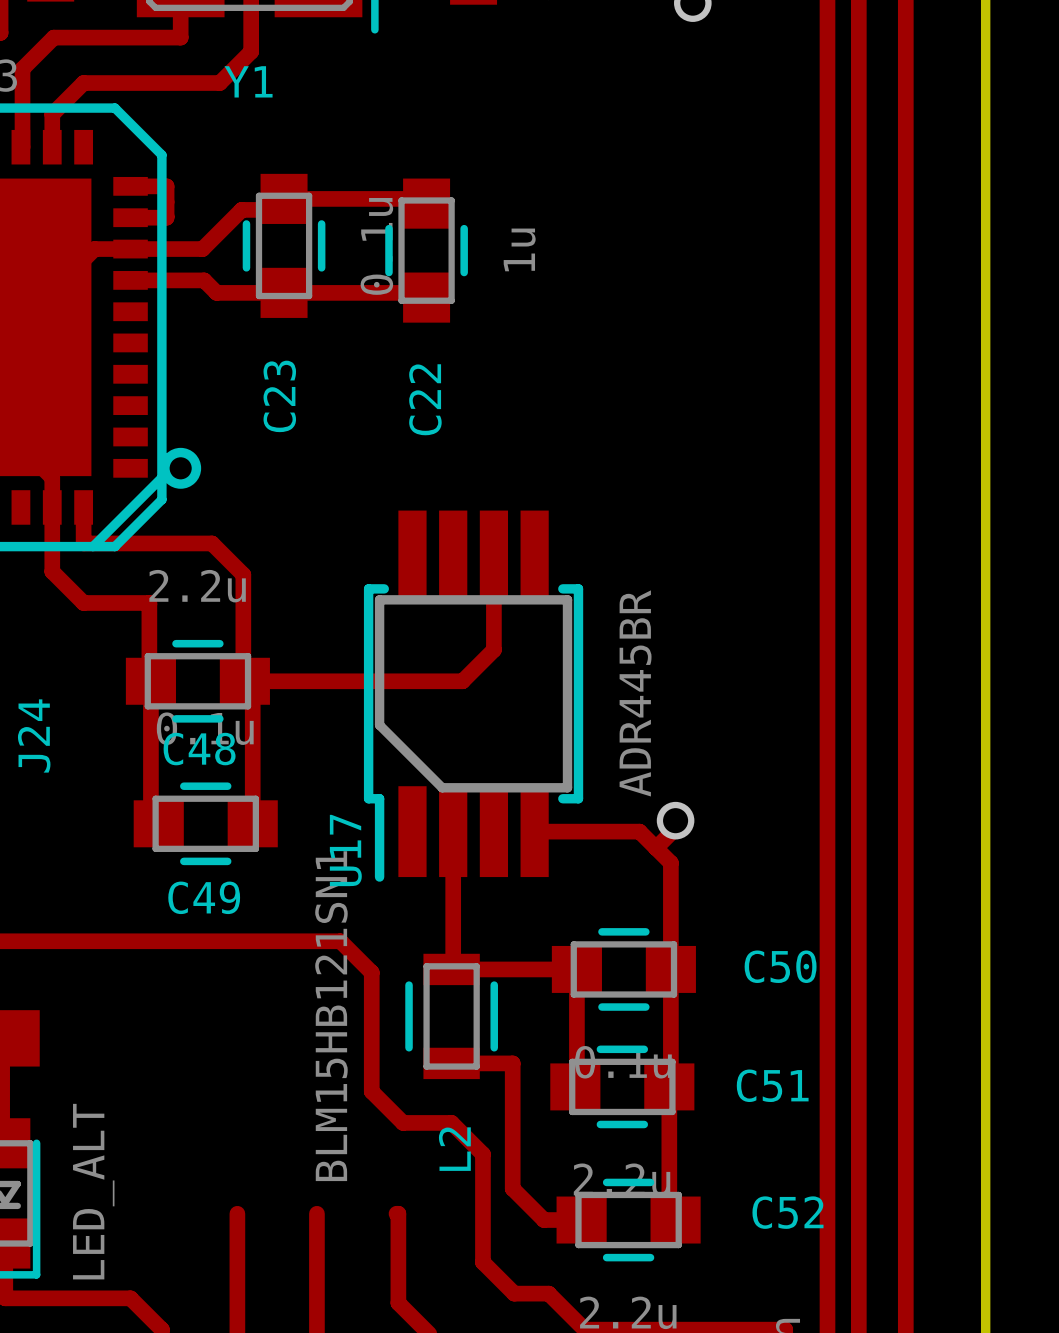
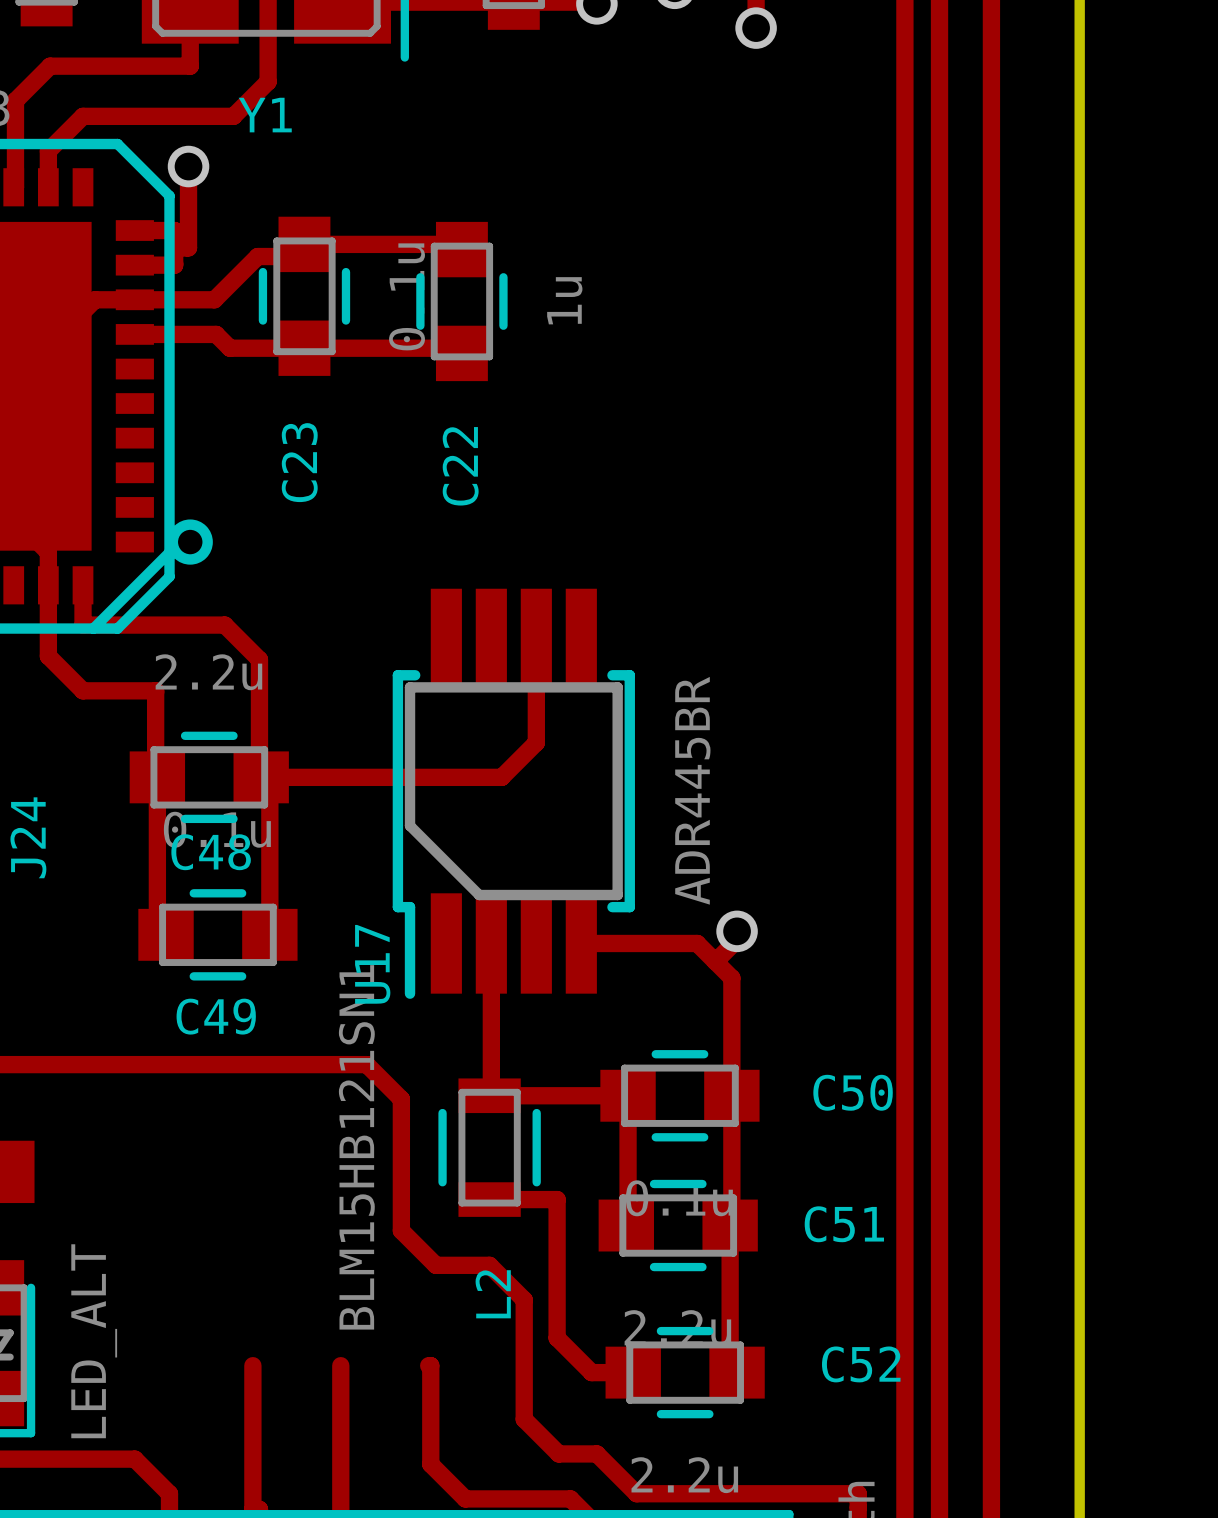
track: none -> (188, 166) (188, 247) (174, 247)
via: none -> (188, 166)

